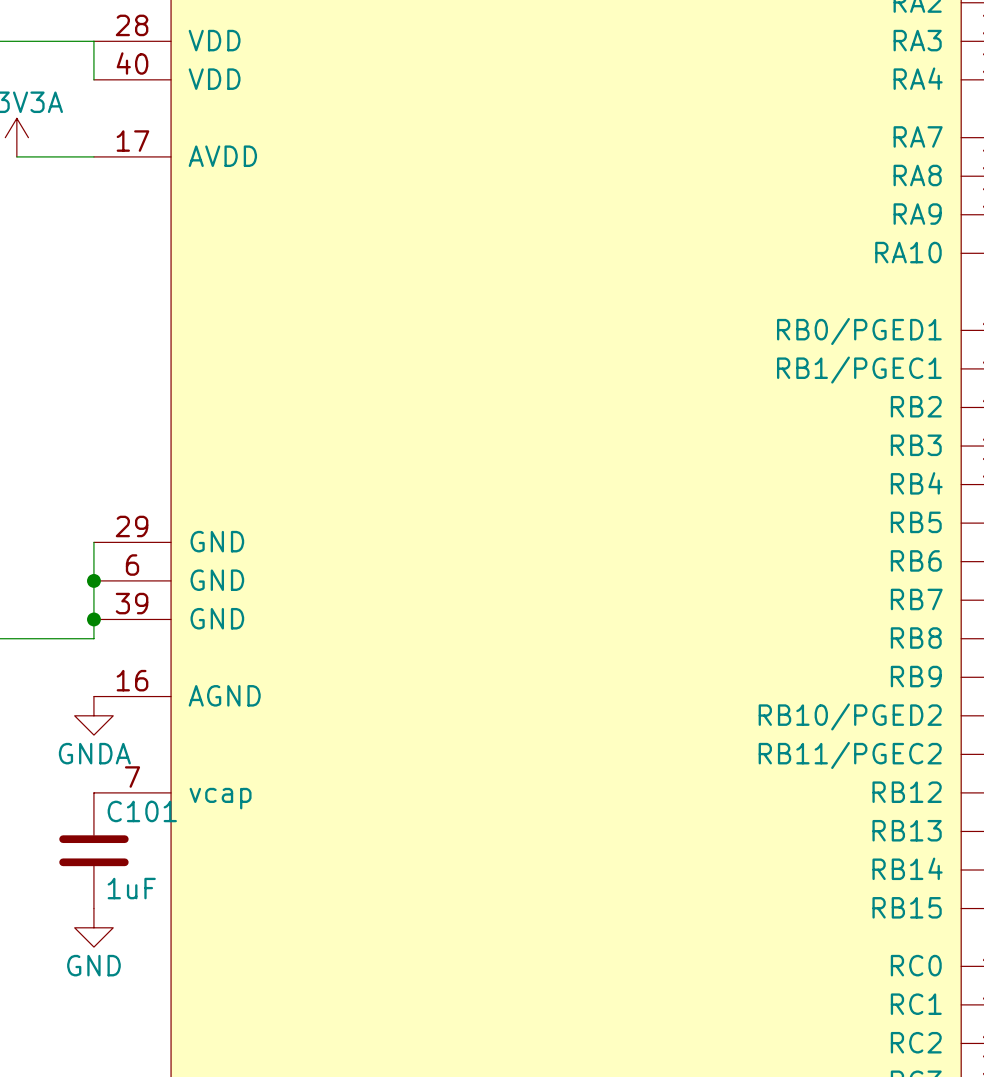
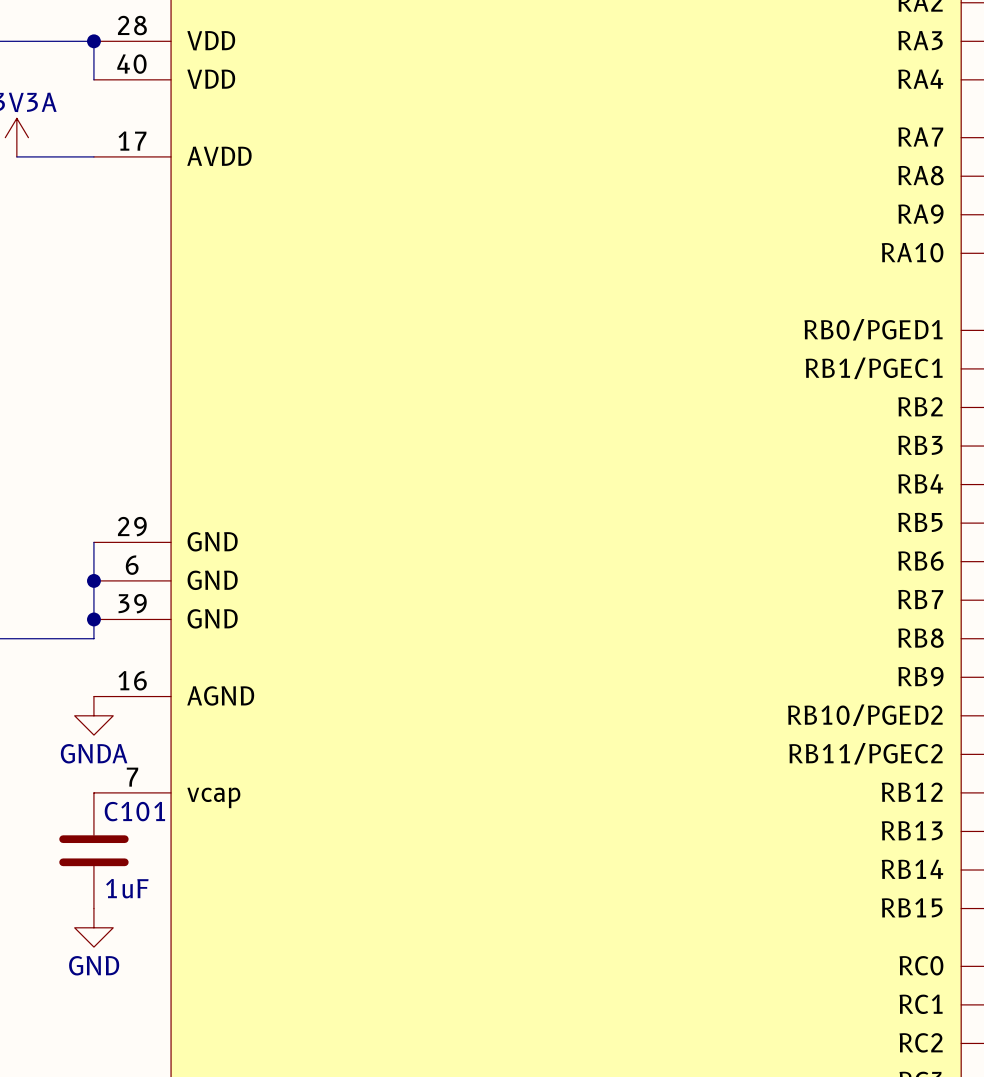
junction: none -> (93, 41)

